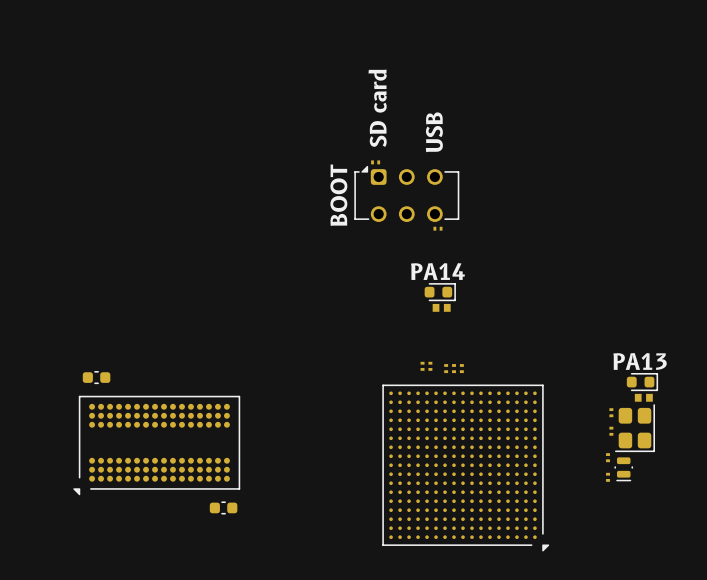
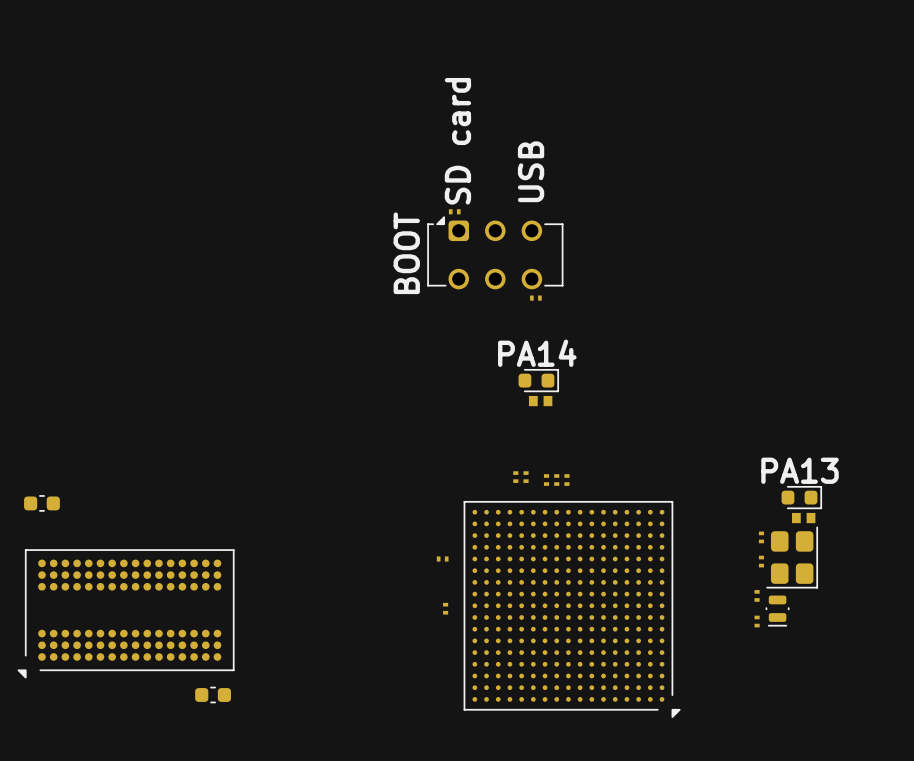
part position: (96, 377) -> (41, 503)
part: none -> (442, 558)
part position: (156, 445) -> (126, 613)
part: none -> (445, 608)
part position: (223, 507) -> (213, 694)

